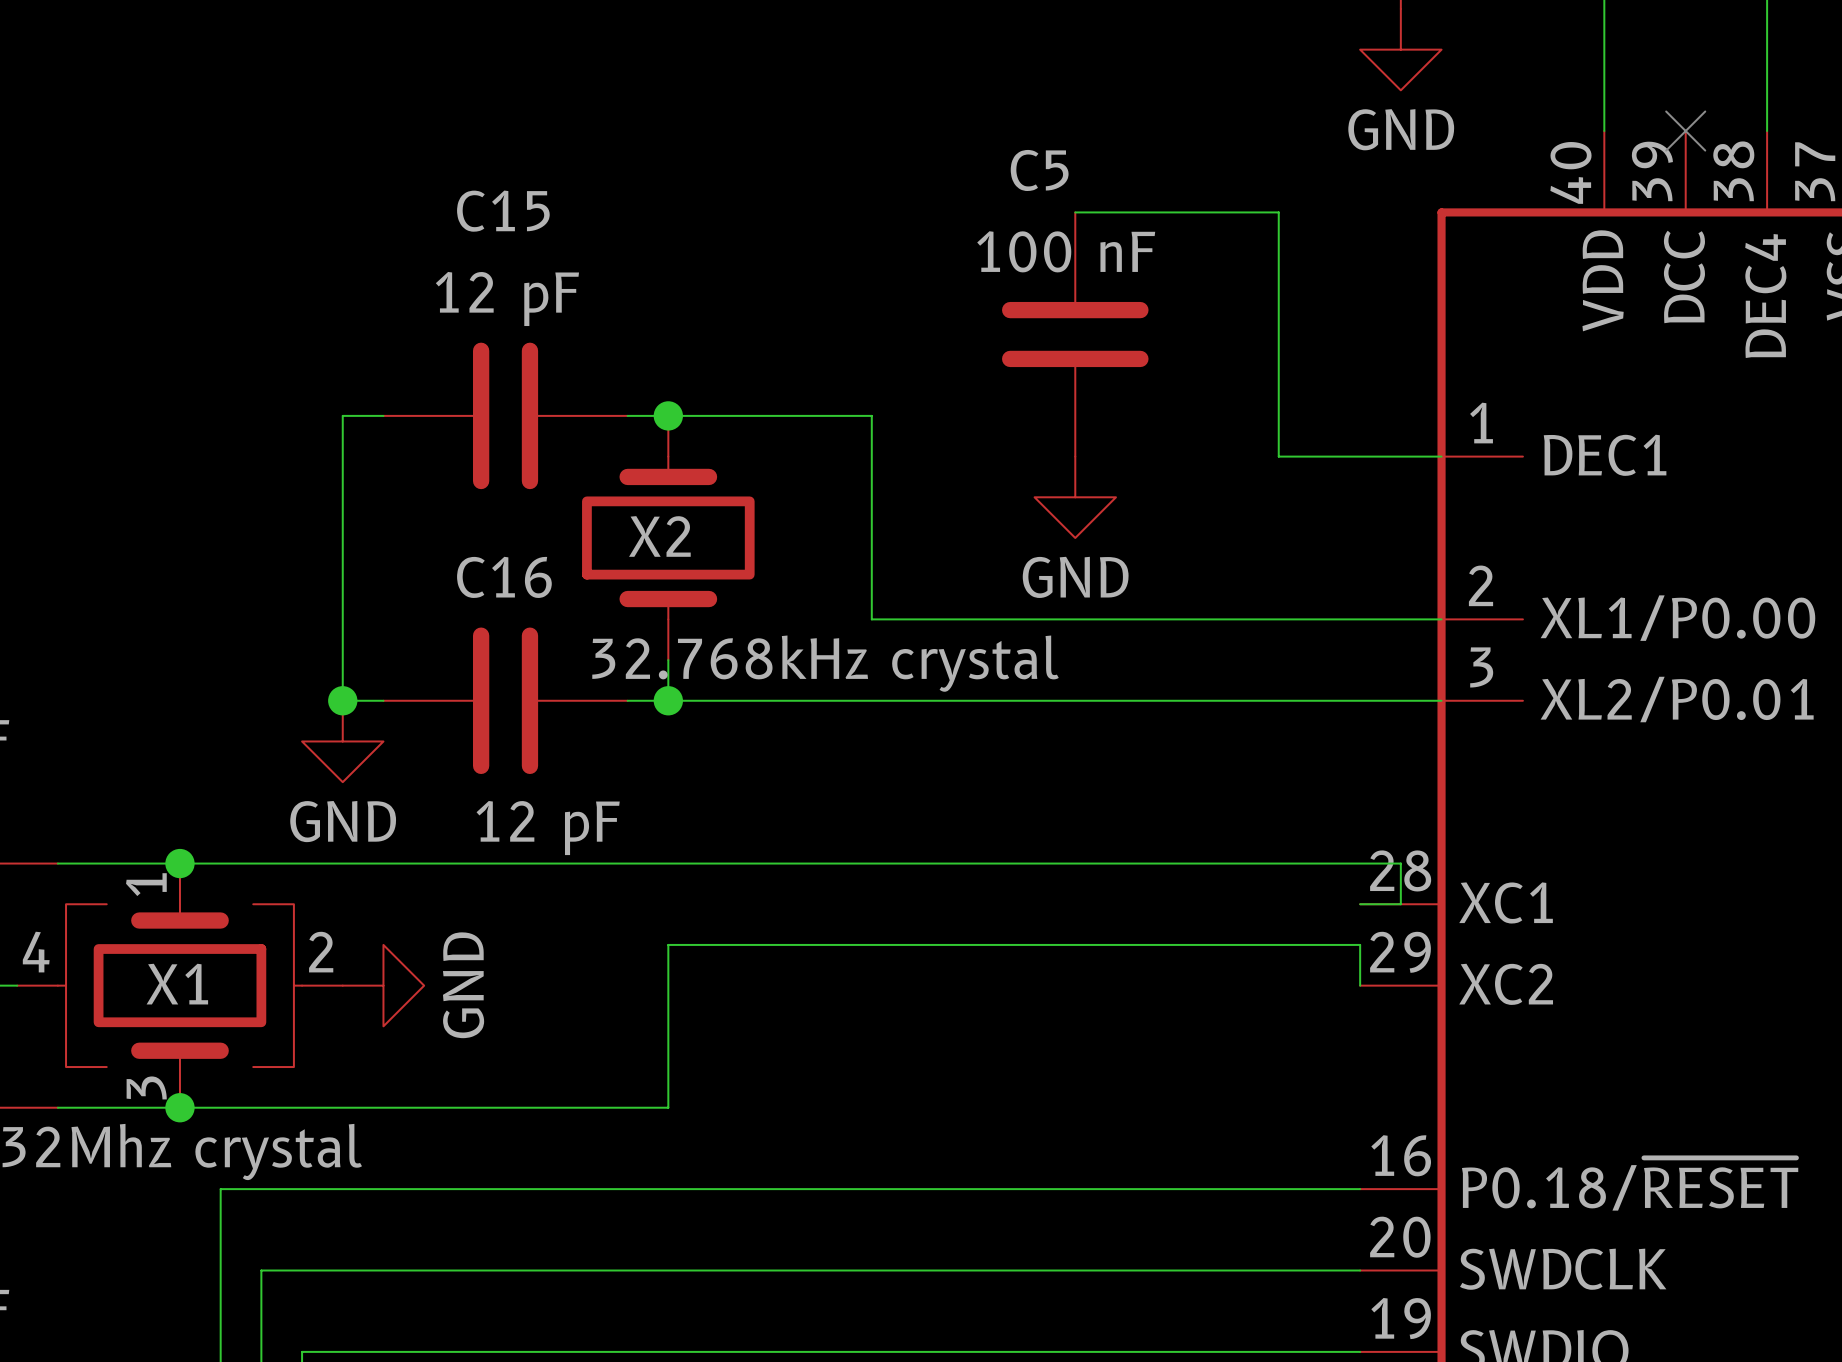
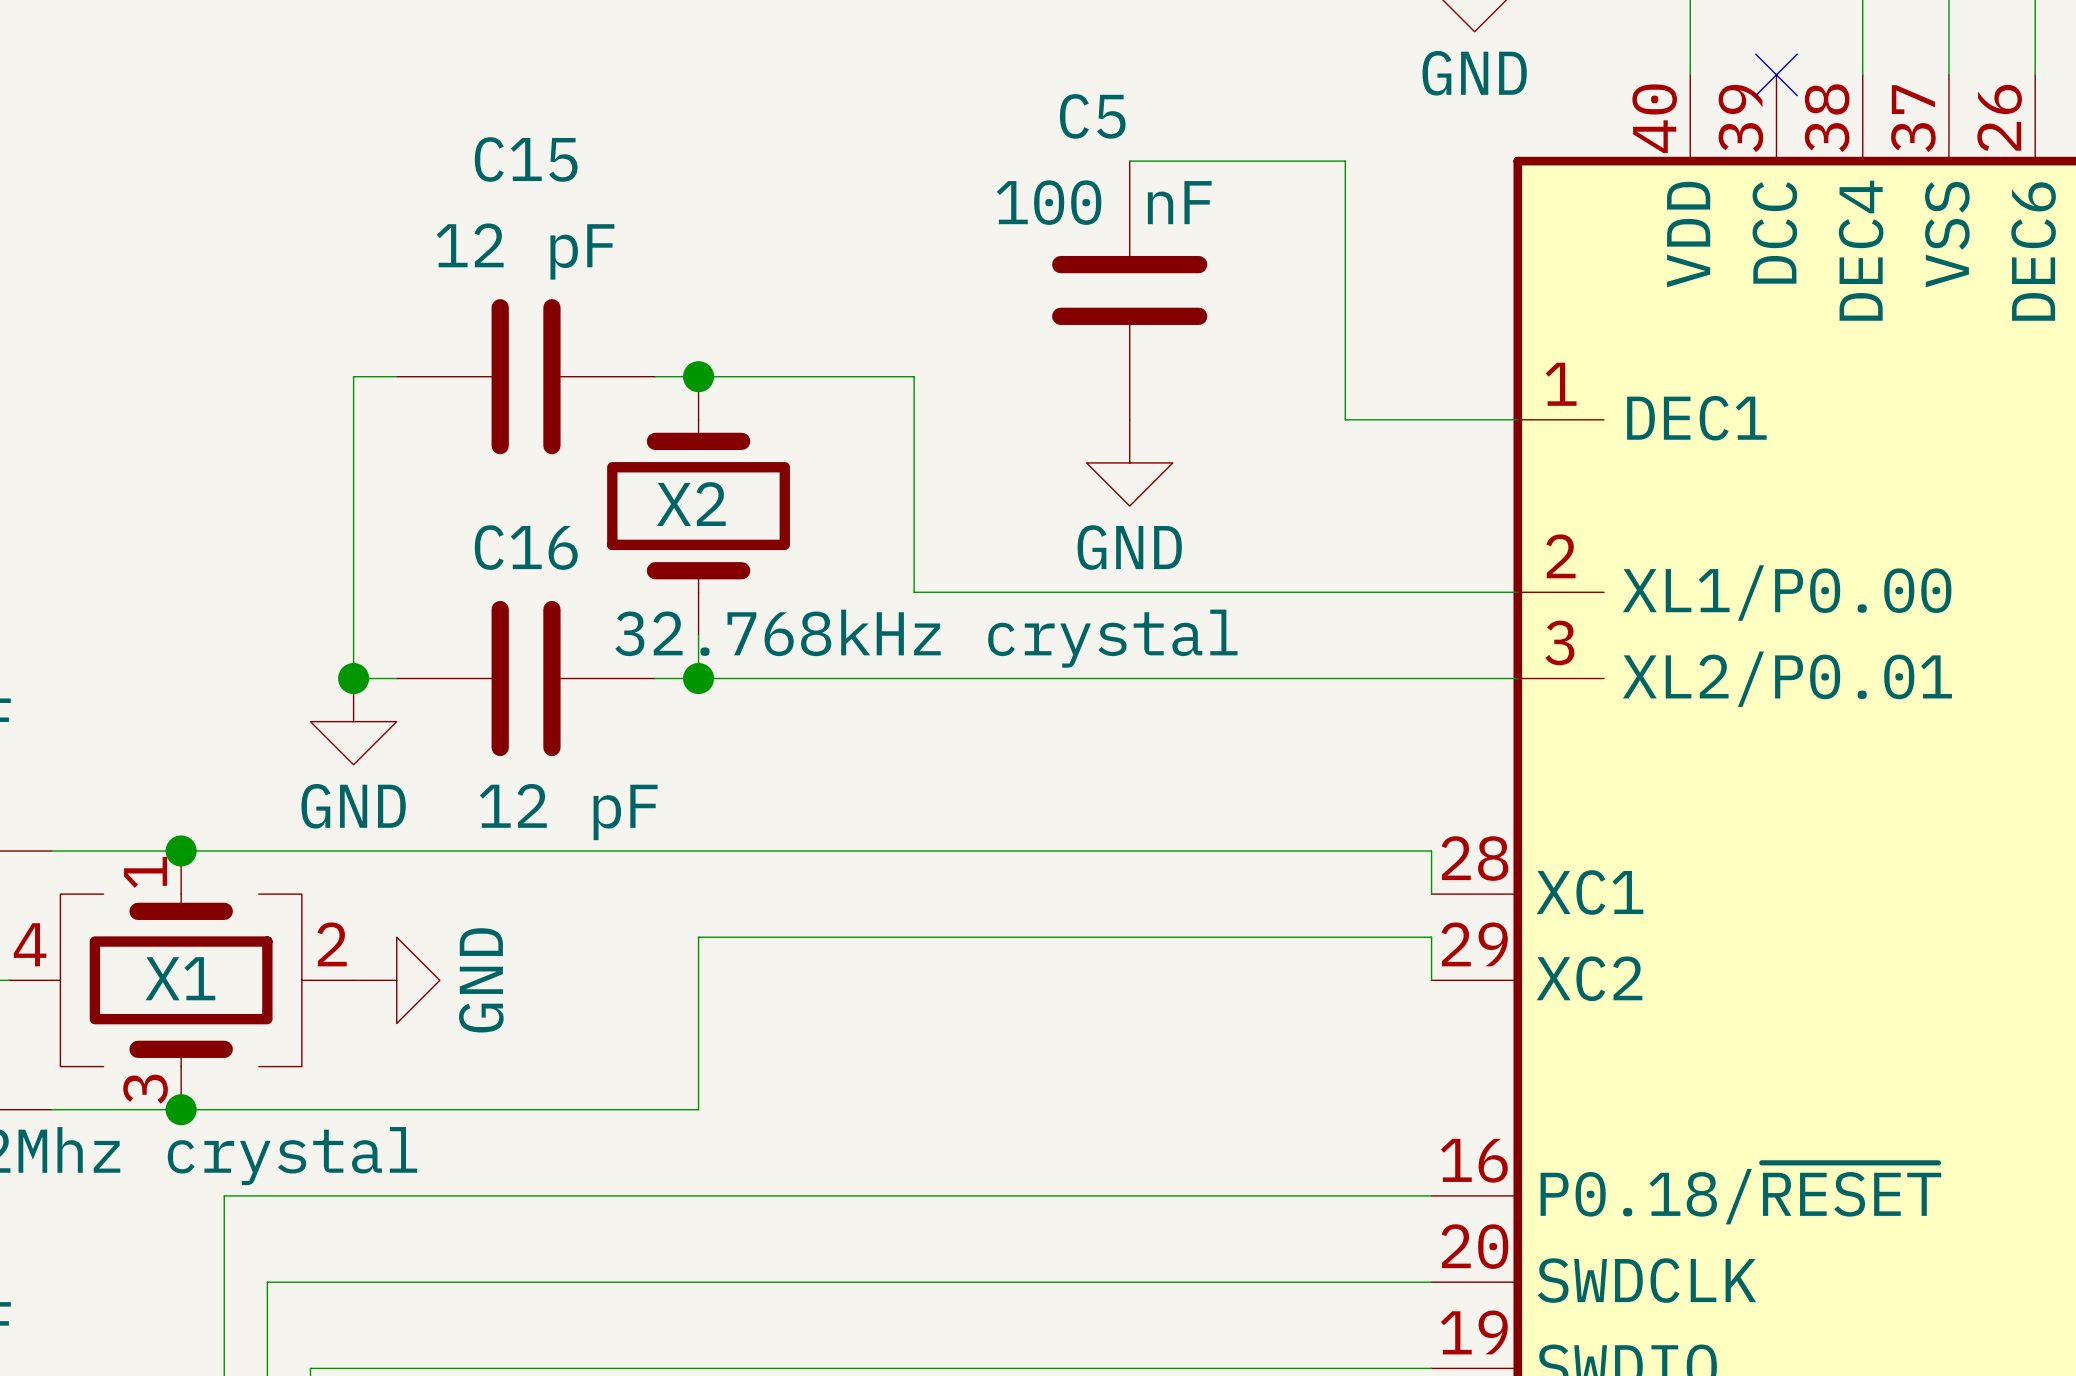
wire: (1360, 863) (1400, 863) (1400, 904) (1360, 904) -> (1431, 850) (1431, 894)

